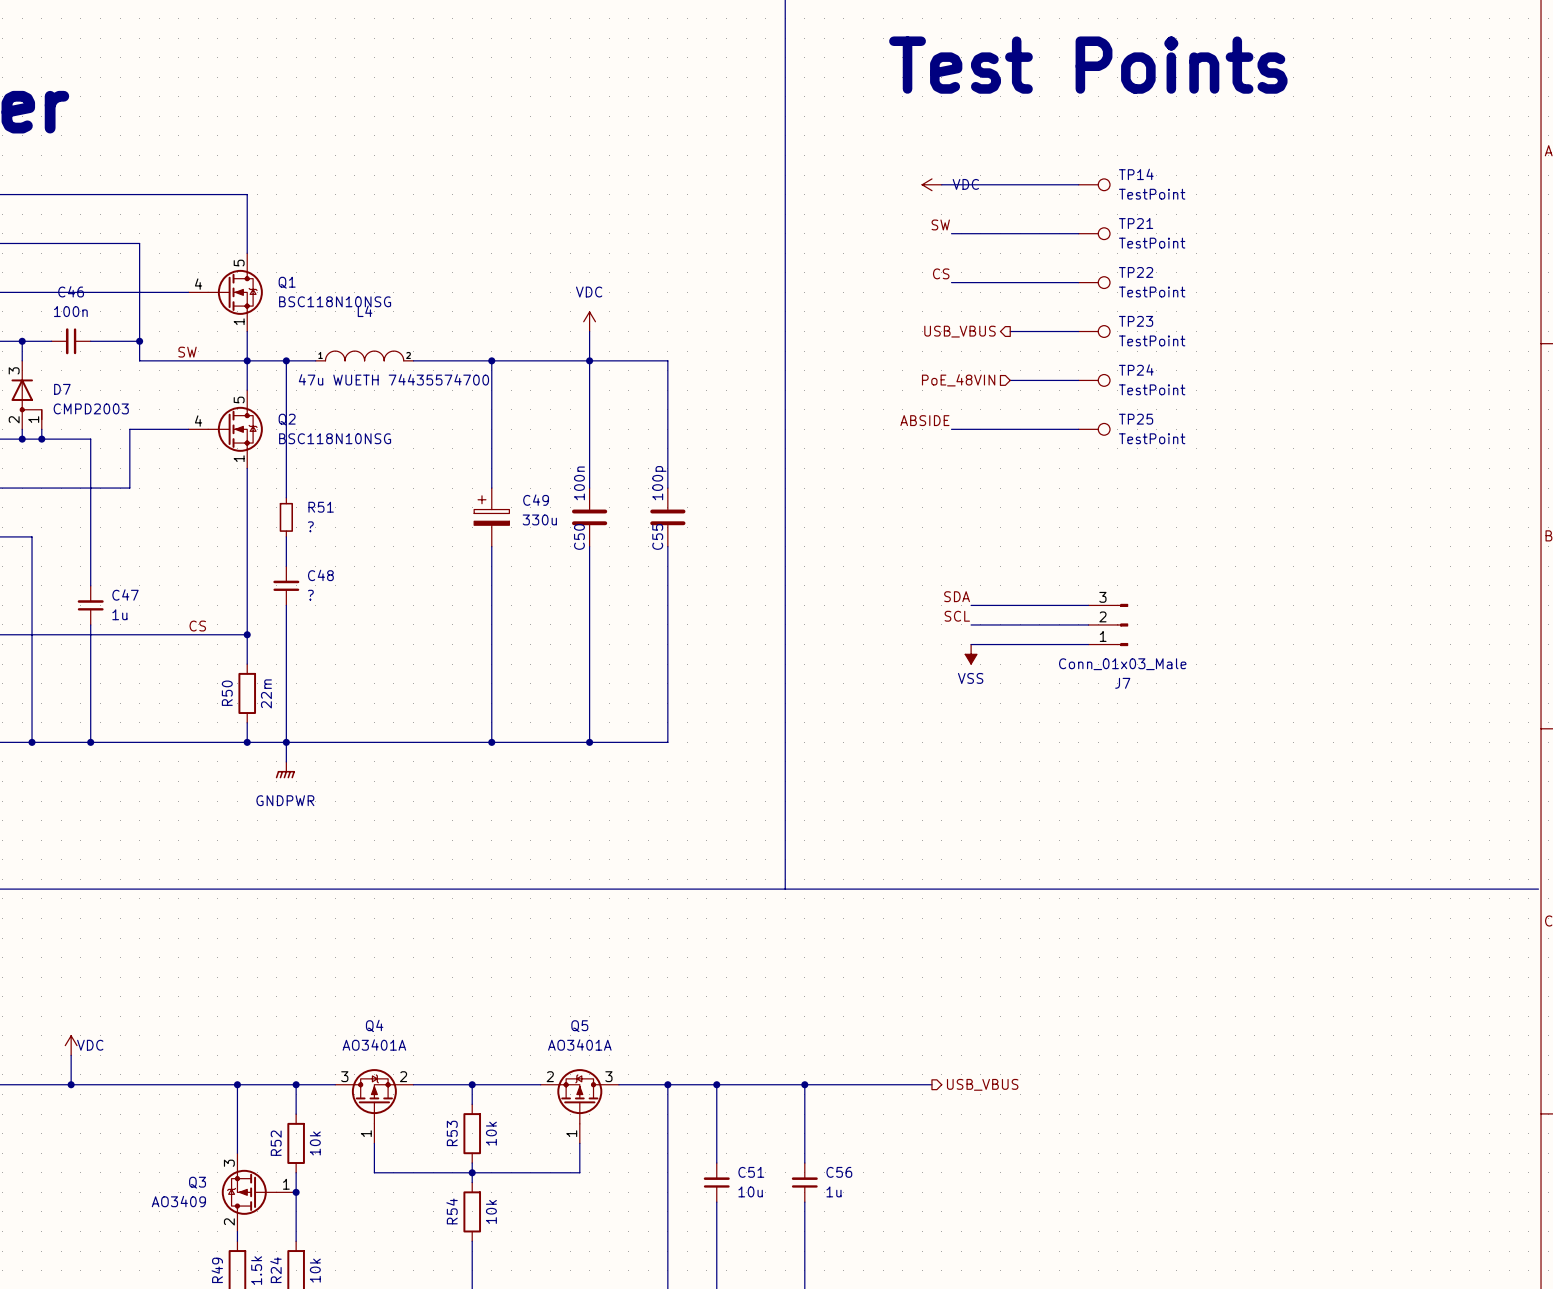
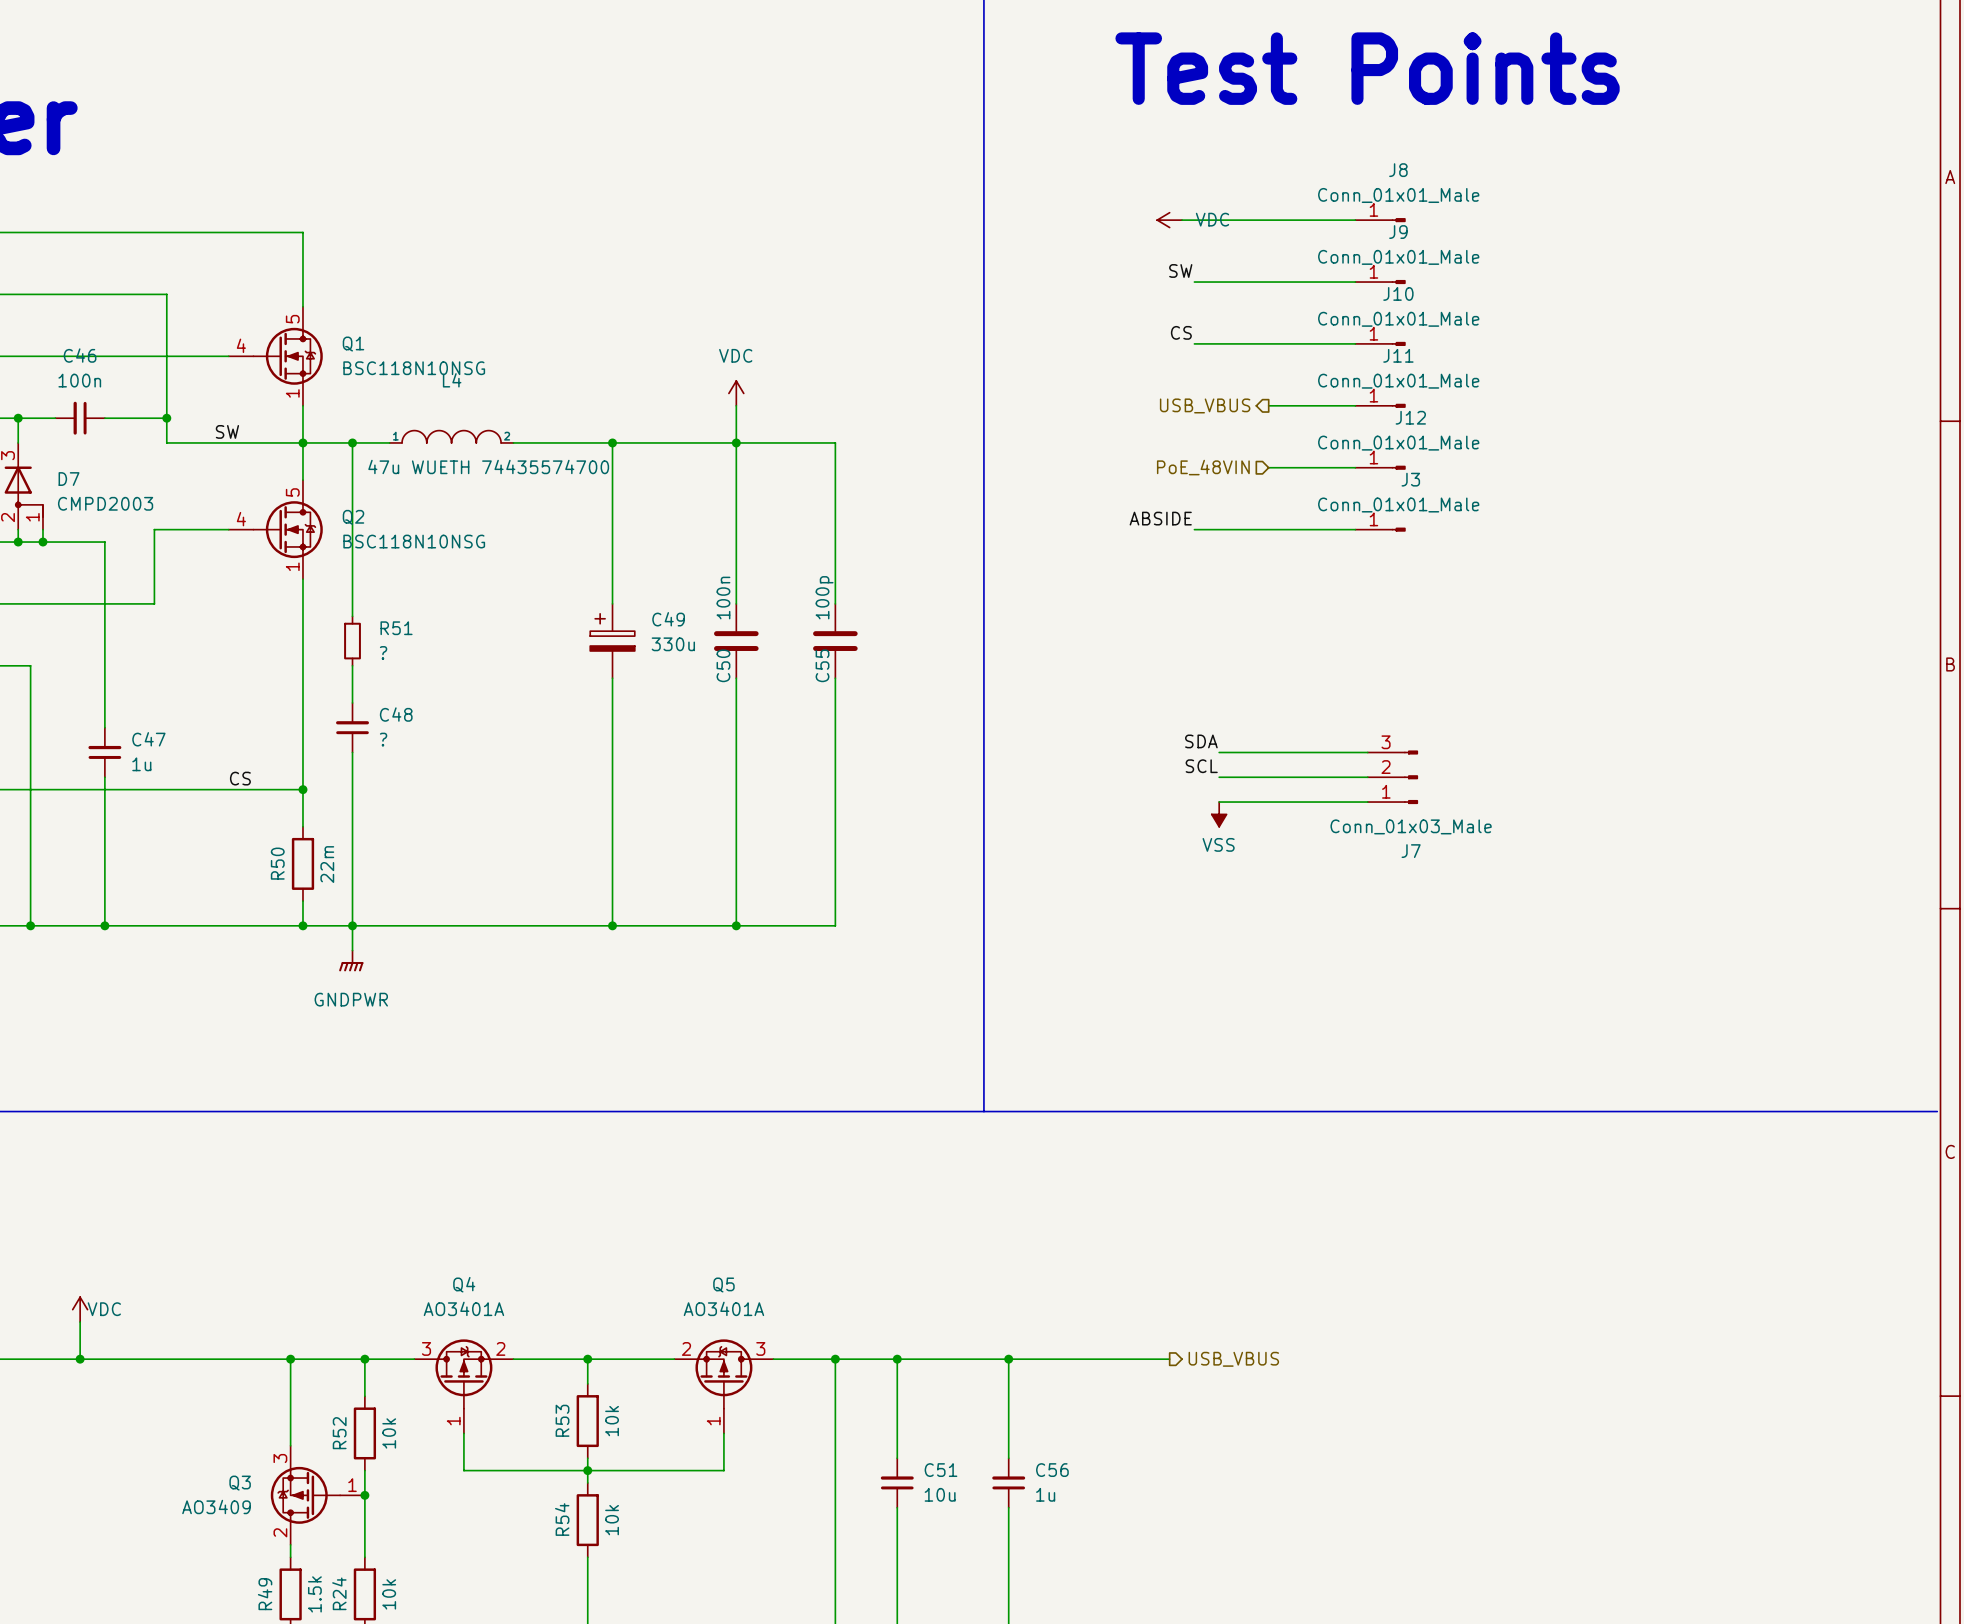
TP14: TestPoint (1094, 184) -> none
J8: none -> Conn_01x01_Male (1380, 220)
TP21: TestPoint (1094, 233) -> none
J9: none -> Conn_01x01_Male (1380, 282)
TP22: TestPoint (1094, 282) -> none
J10: none -> Conn_01x01_Male (1380, 343)
TP23: TestPoint (1094, 331) -> none
J11: none -> Conn_01x01_Male (1380, 405)
TP24: TestPoint (1094, 380) -> none
J12: none -> Conn_01x01_Male (1380, 467)
TP25: TestPoint (1094, 429) -> none
J3: none -> Conn_01x01_Male (1380, 529)

